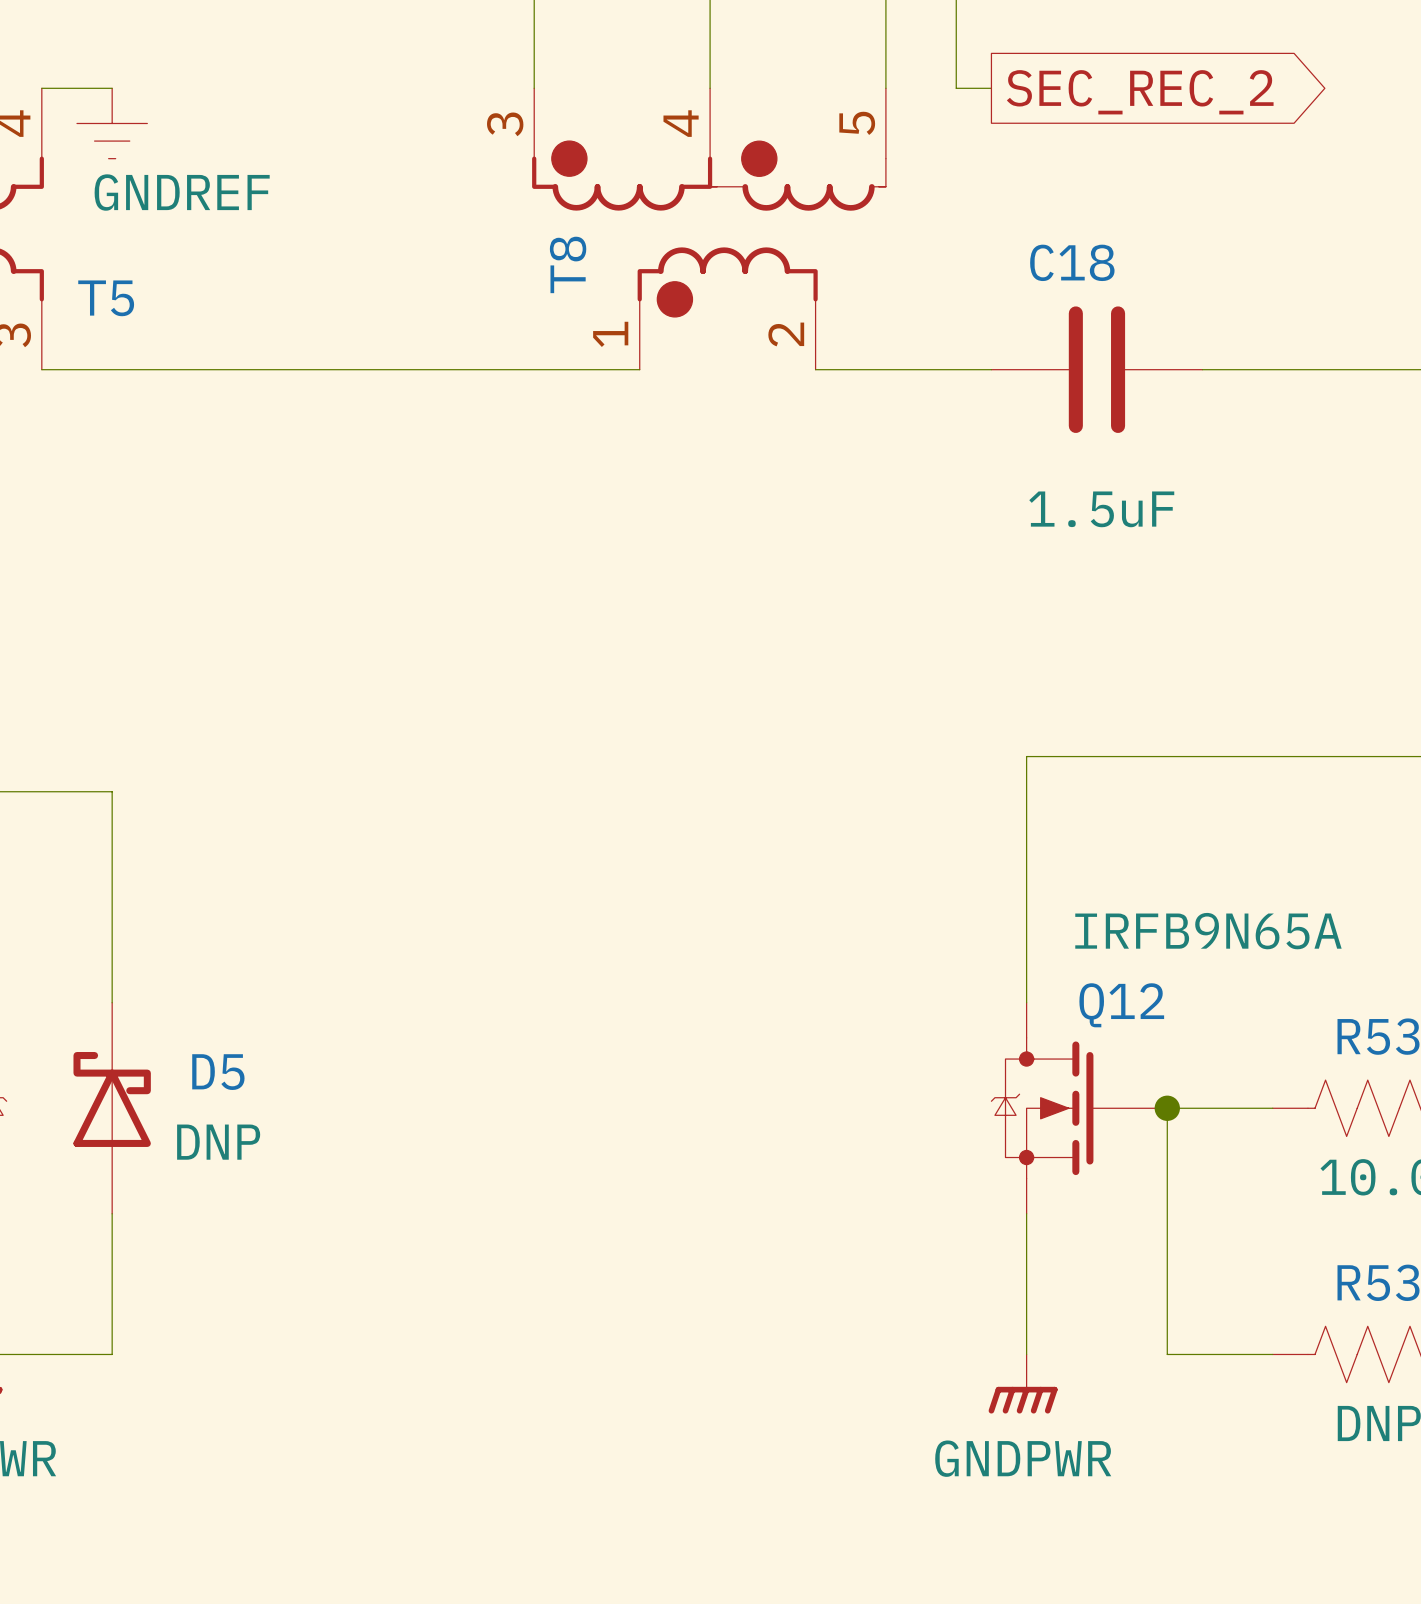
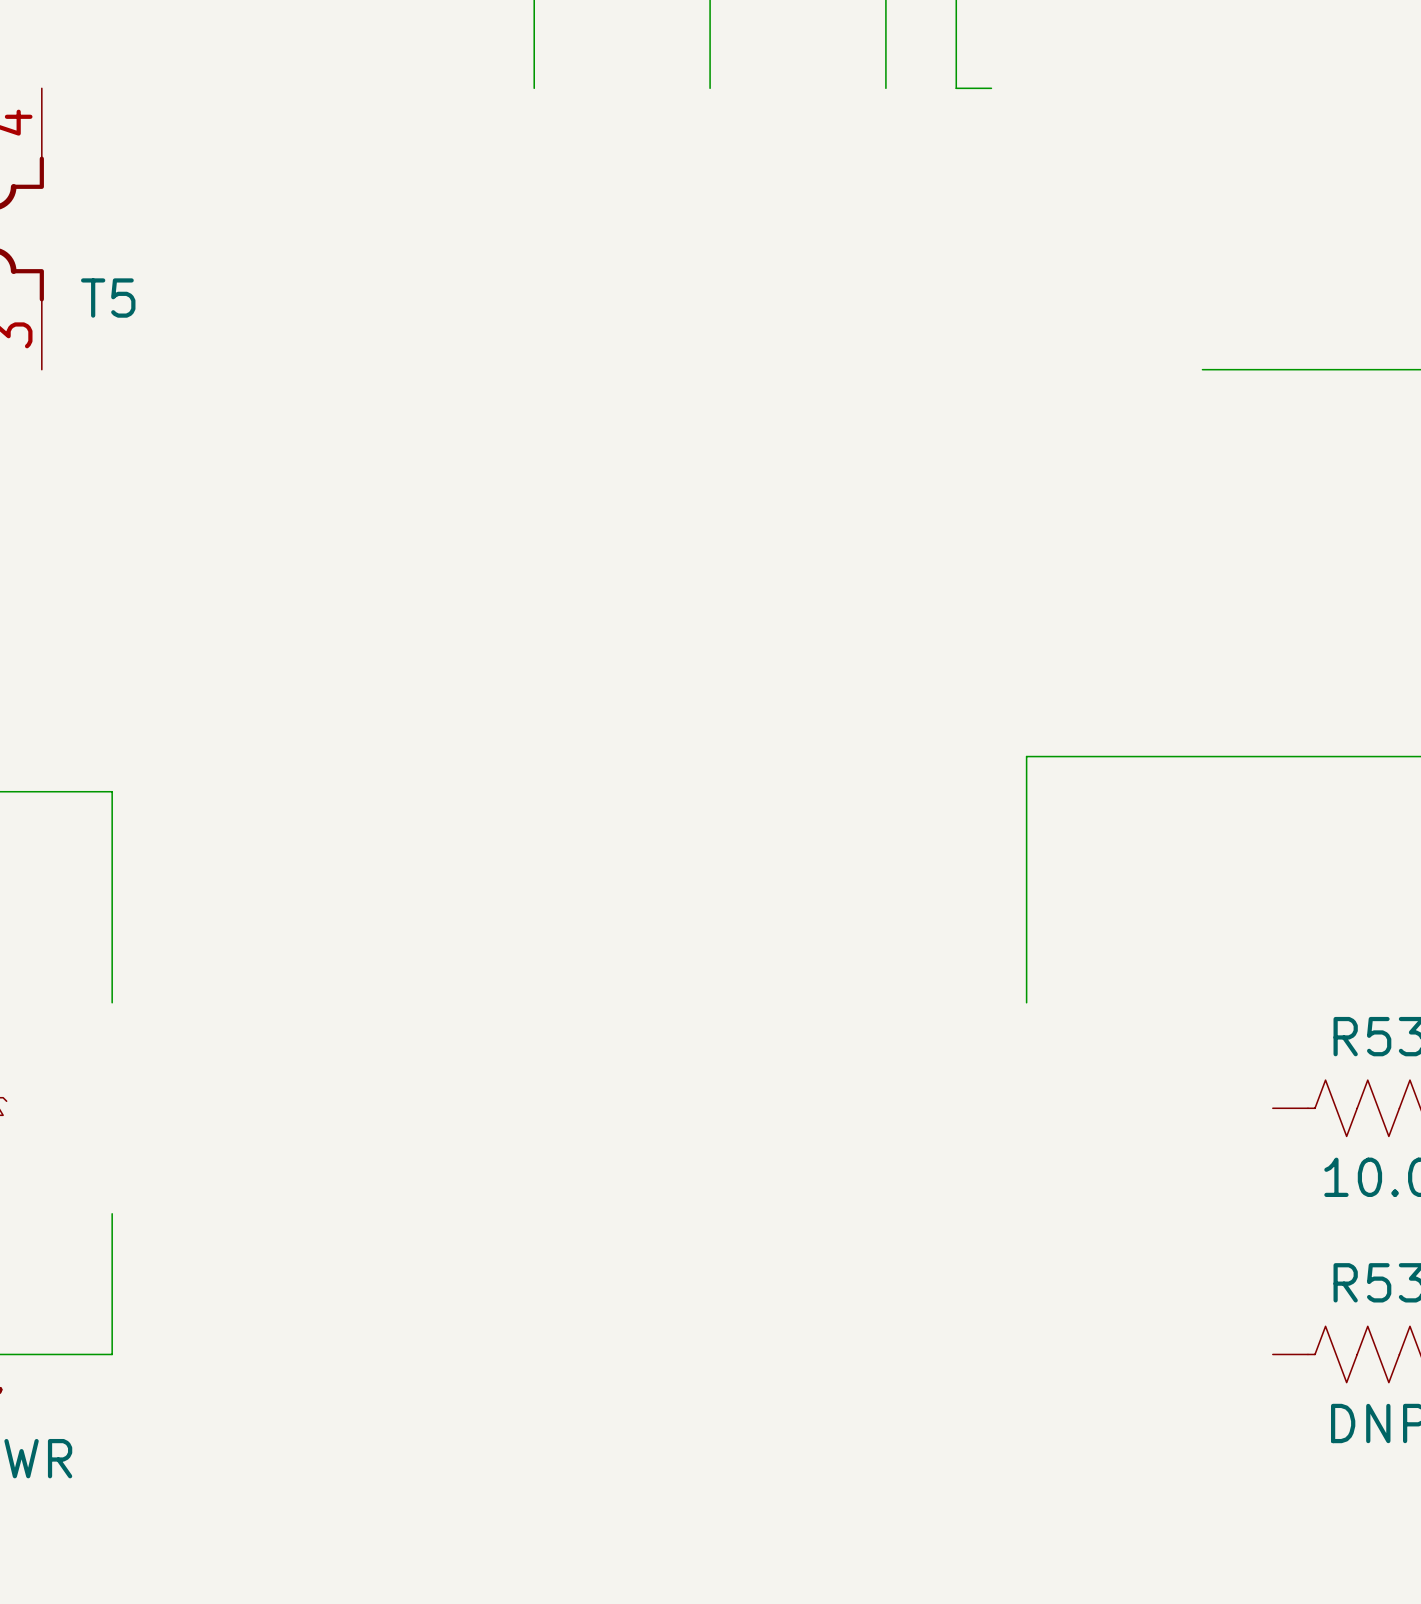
wire: (41, 88) (112, 88) -> none
global label: SEC_REC_2 (1140, 92) -> none
power symbol: GNDREF (112, 123) -> none
T8: (709, 229) -> none
wire: (41, 369) (639, 369) -> none
wire: (815, 369) (991, 369) -> none
C18: 1.5uF (1096, 369) -> none
D5: DNP (112, 1108) -> none
Q12: IRFB9N65A (1079, 1108) -> none
junction: (1167, 1108) -> none
wire: (1272, 1108) (1167, 1108) (1167, 1354) (1272, 1354) -> none
wire: (1026, 1213) (1026, 1354) -> none
power symbol: GNDPWR (1023, 1384) -> none

